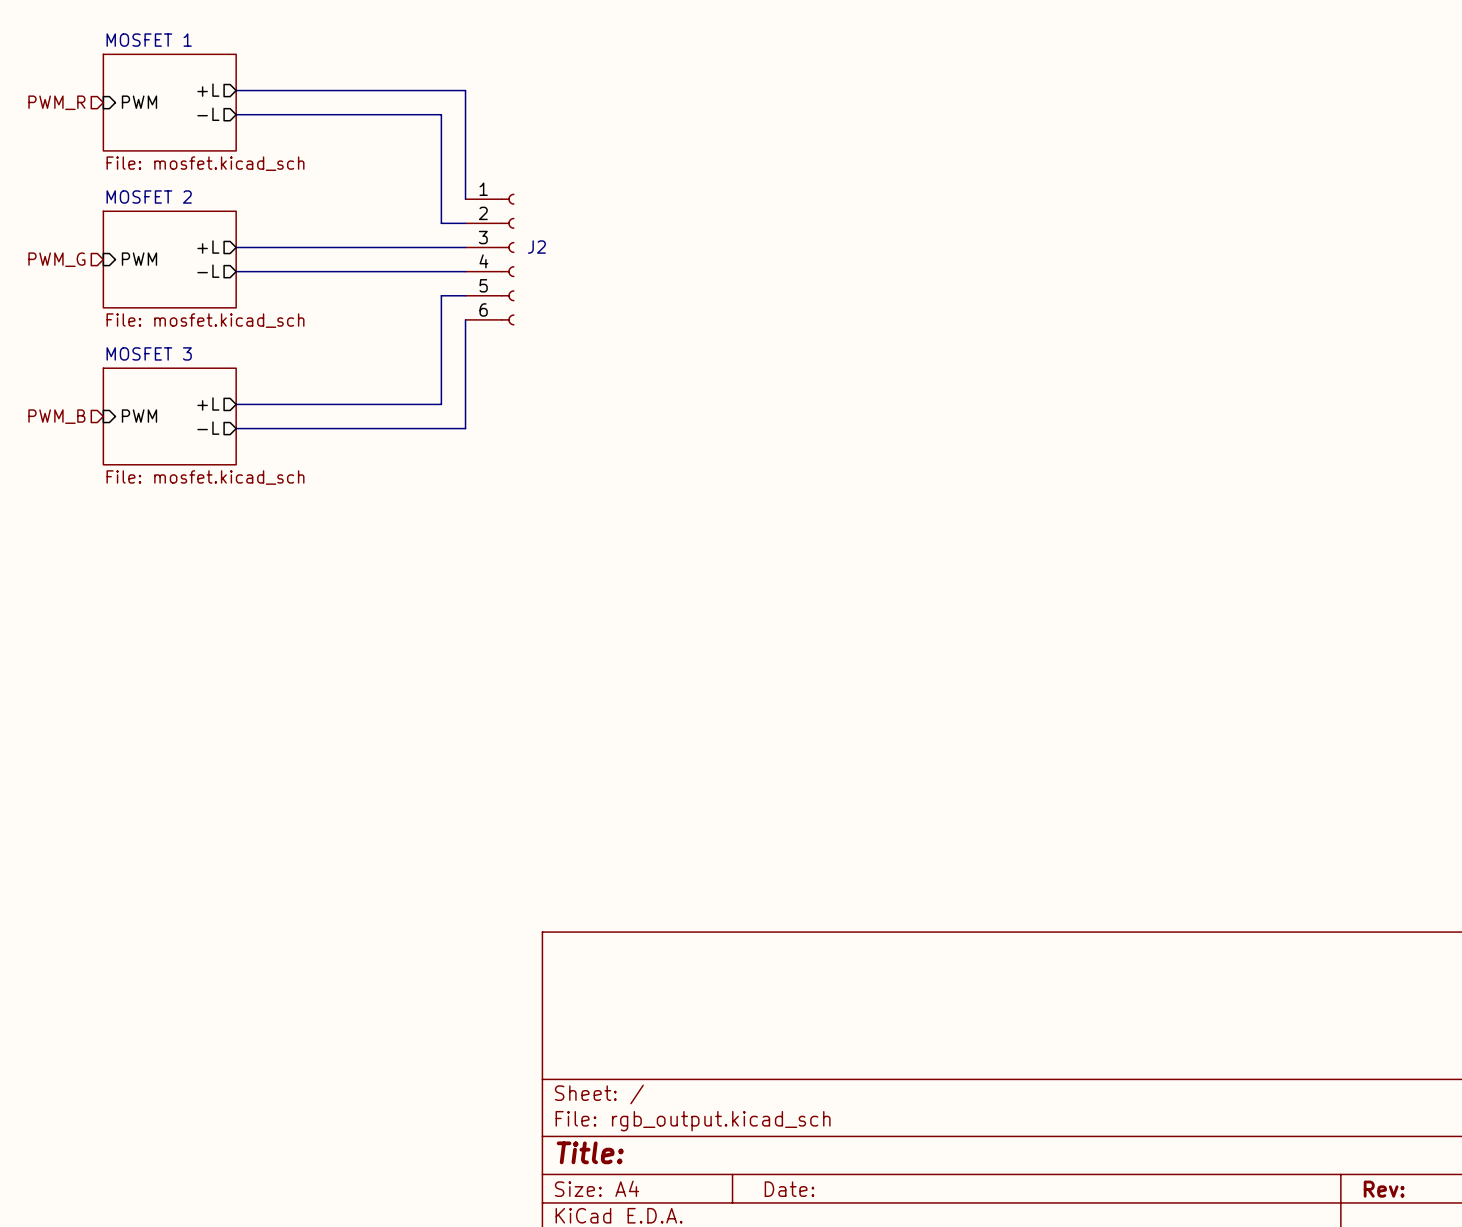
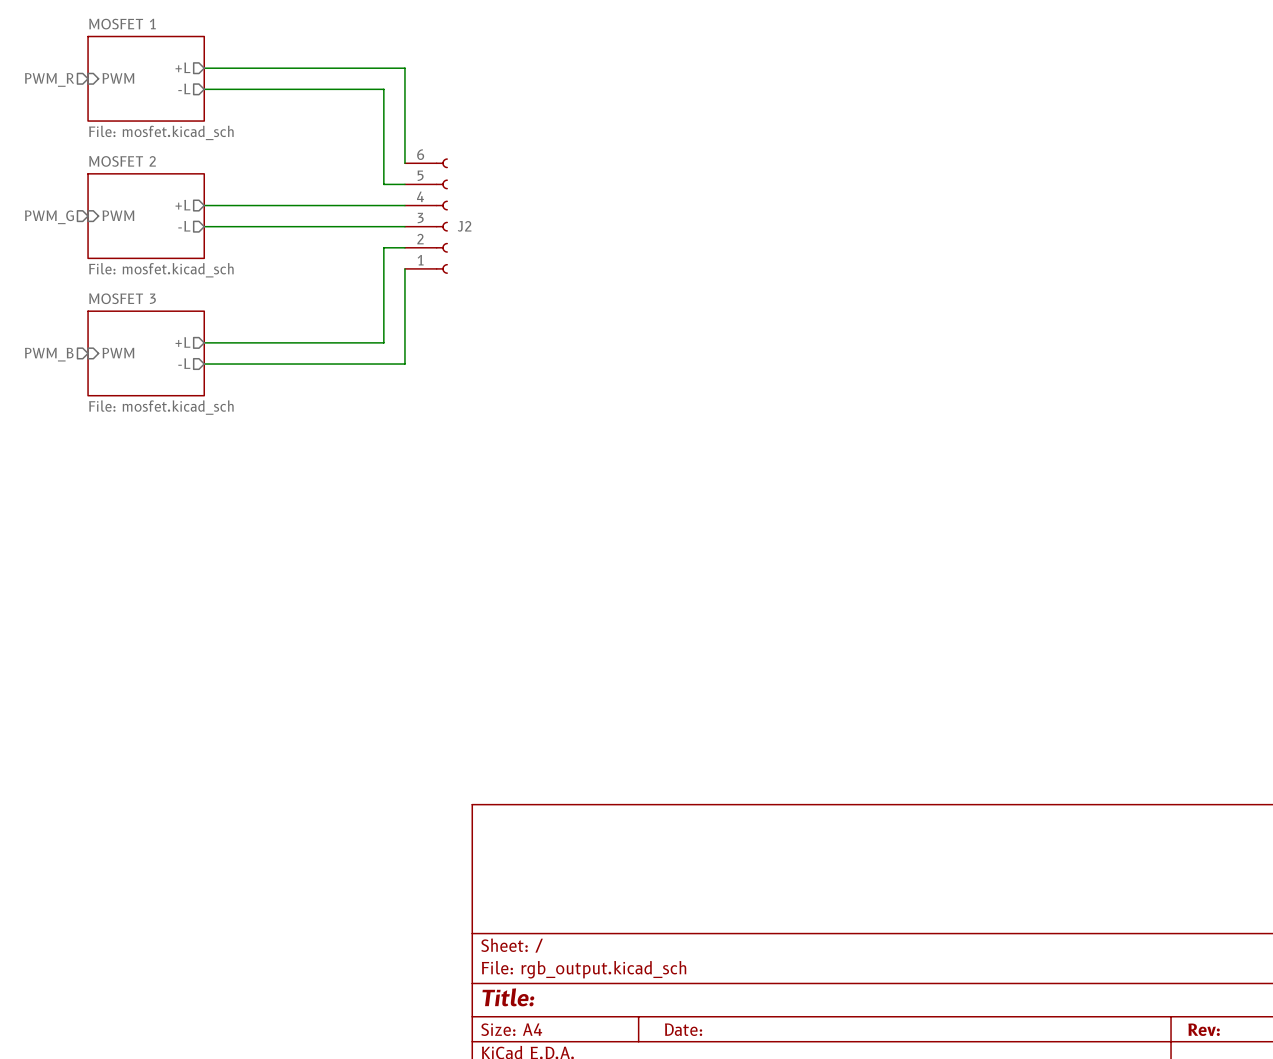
J2 flip: as is (507, 259) -> up-down (441, 216)

